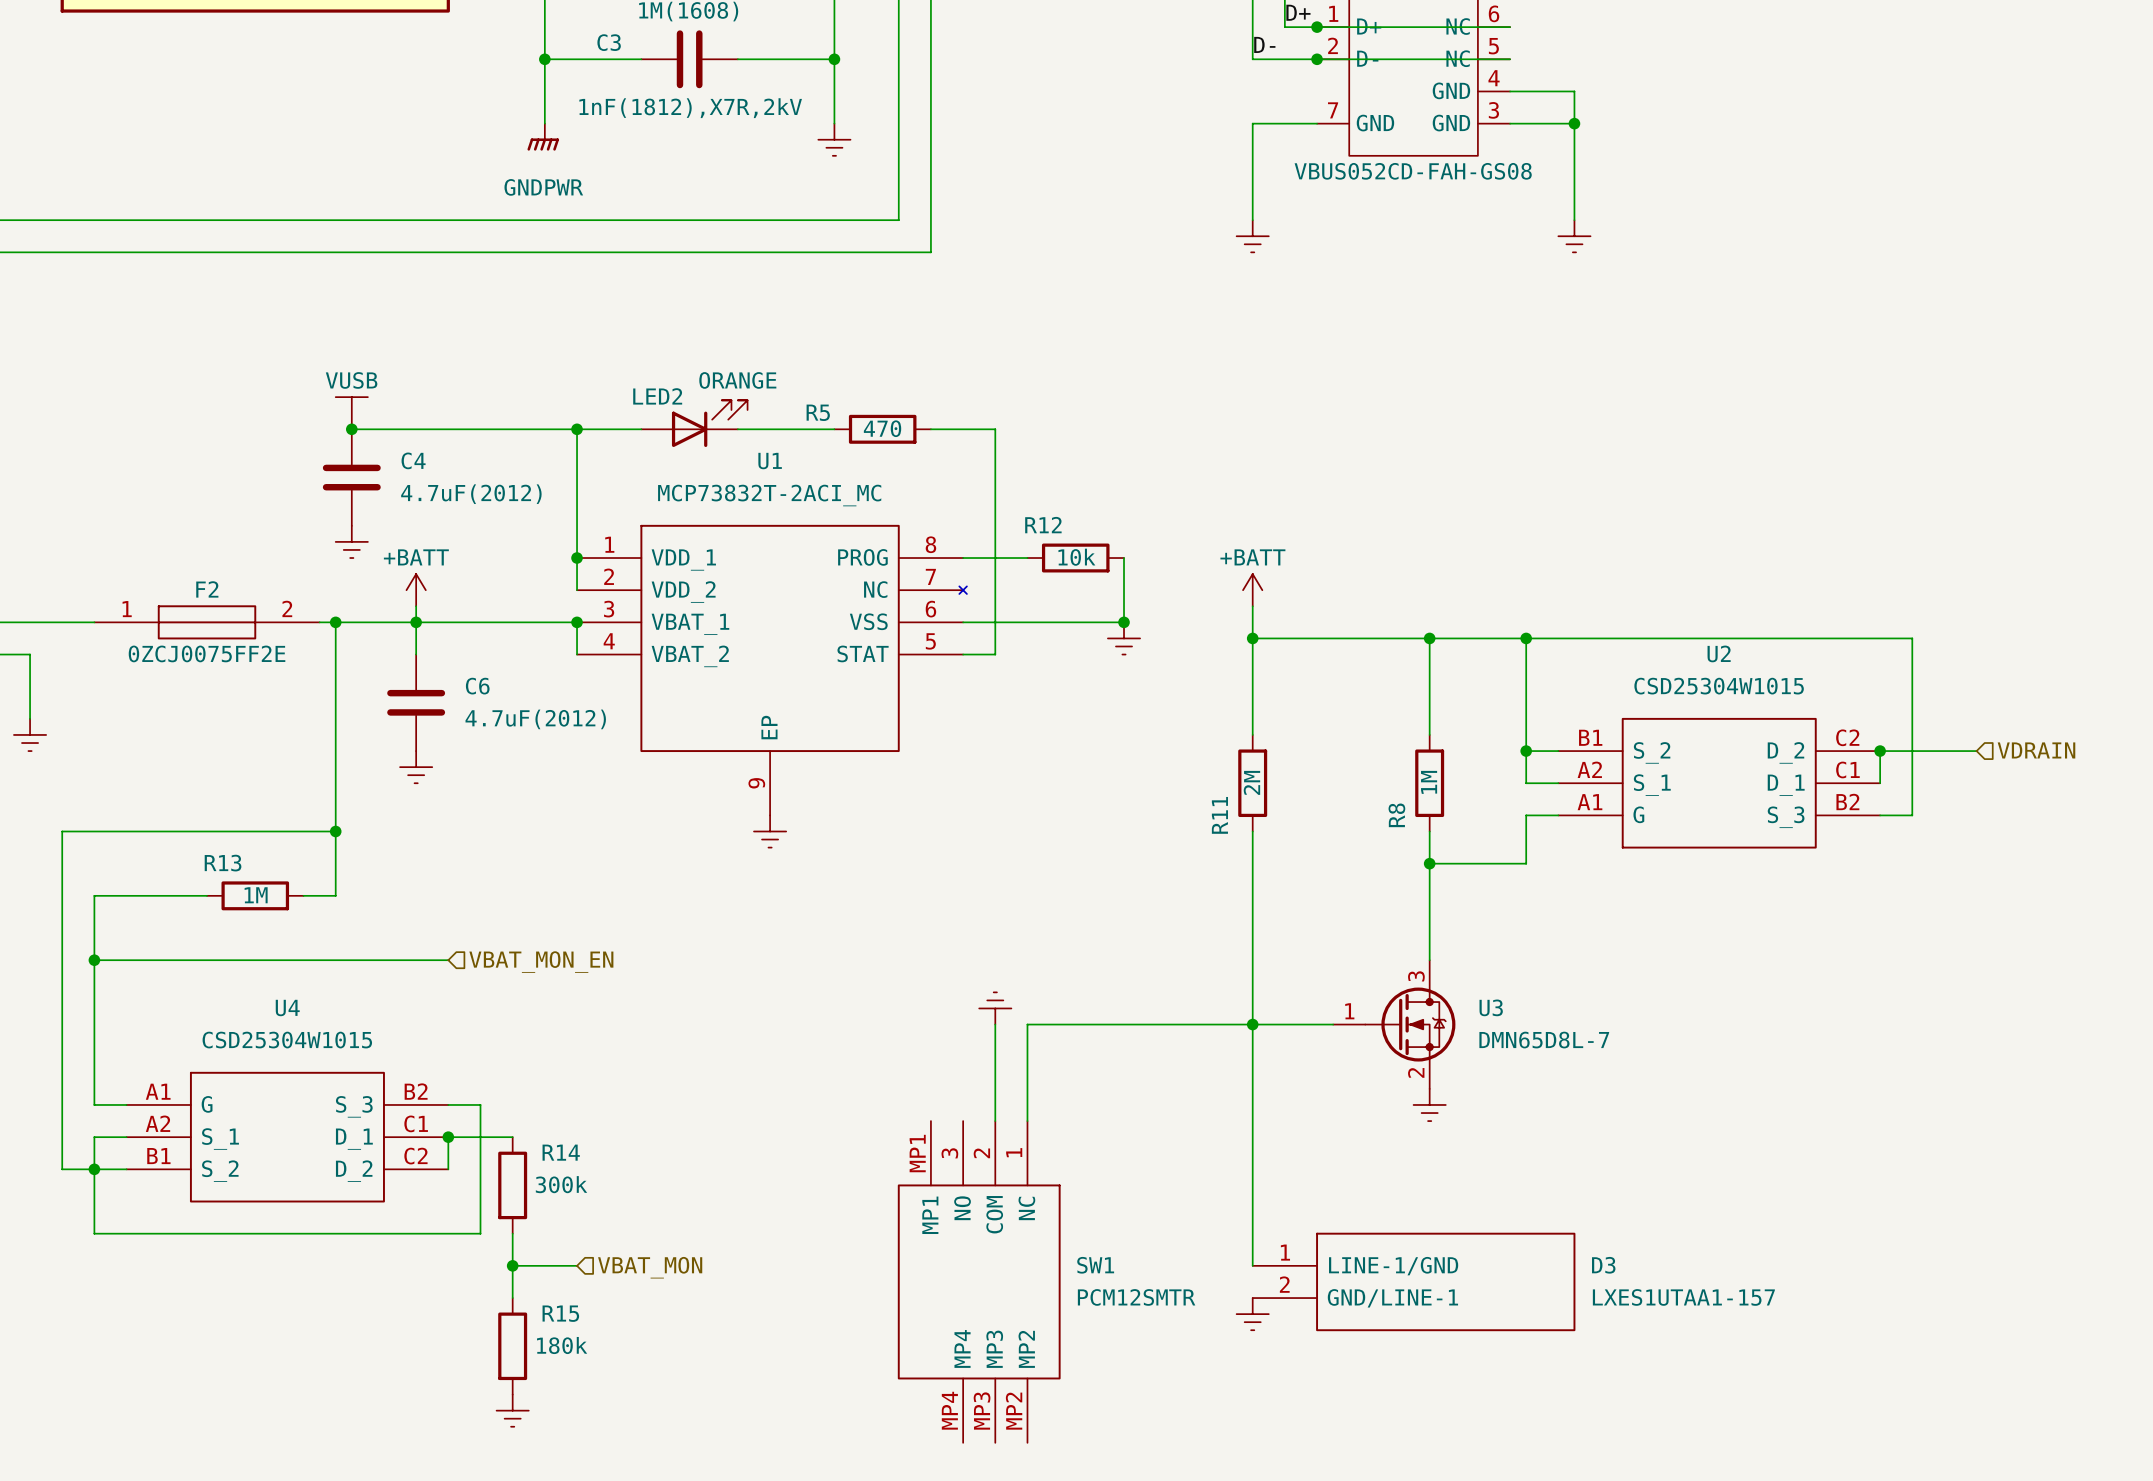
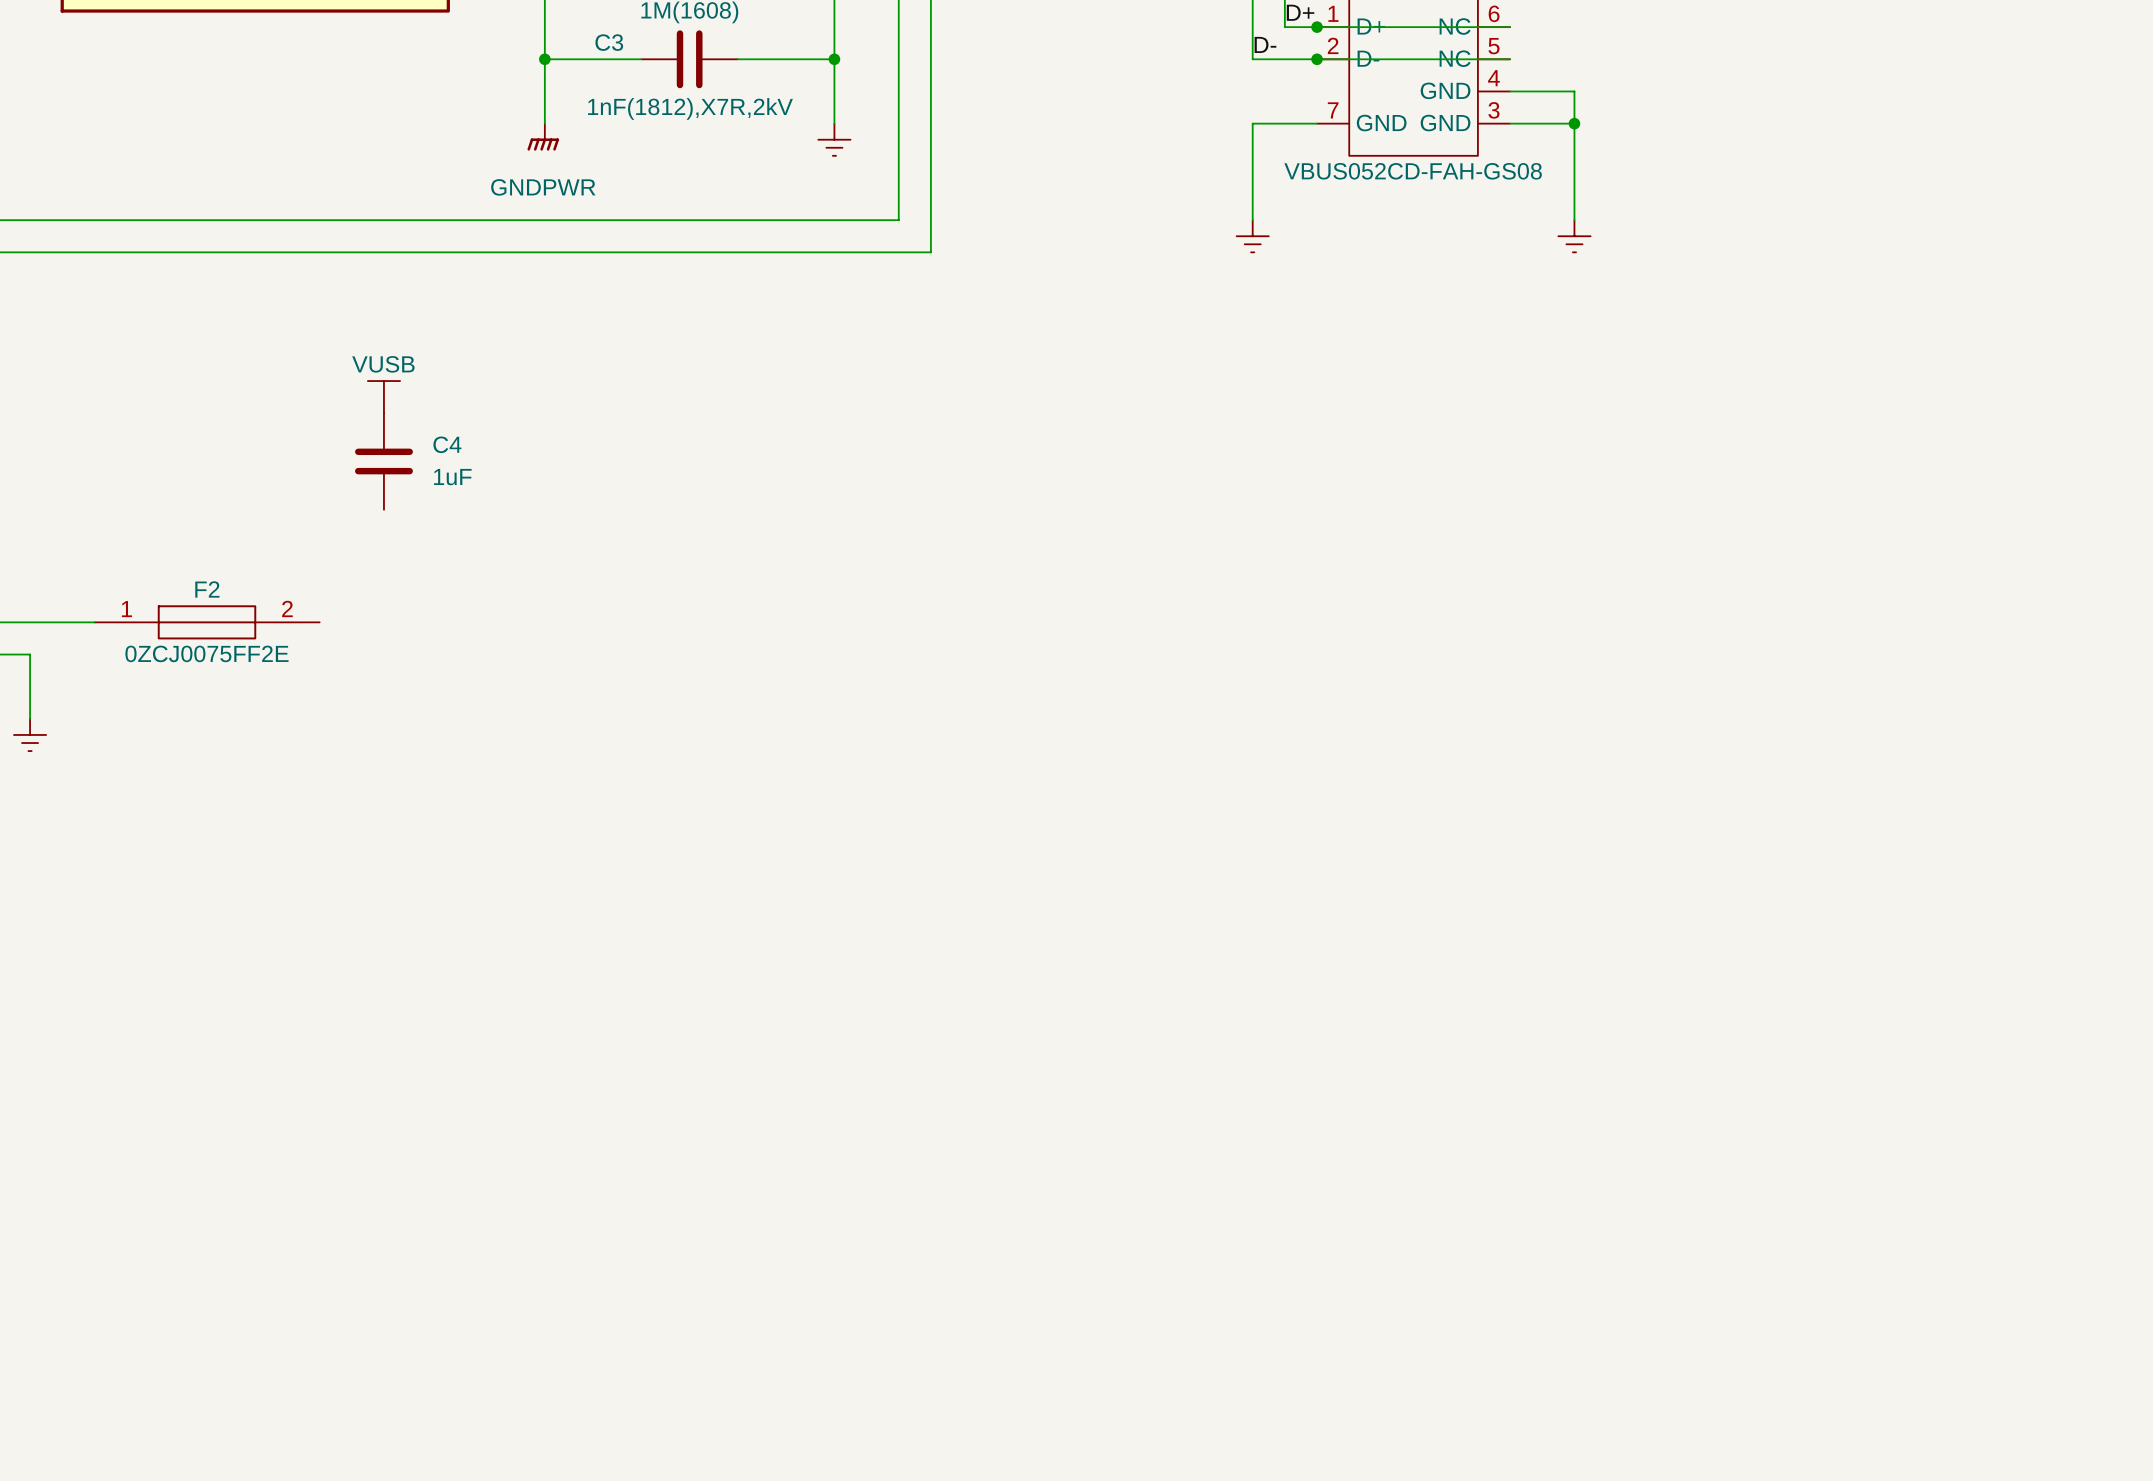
power symbol position: VUSB (351, 413) -> VUSB (383, 397)
LED2: ORANGE (694, 423) -> none
wire: (351, 429) (641, 429) -> none
junction: (351, 429) -> none
wire: (577, 429) (577, 590) -> none
junction: (577, 429) -> none
wire: (737, 429) (834, 429) -> none
R5: 470 (882, 429) -> none
wire: (930, 429) (995, 429) (995, 654) (963, 654) -> none
C4 position: (351, 477) -> (383, 461)
C4 value: 4.7uF(2012) (471, 494) -> 1uF (452, 477)
power symbol: (351, 541) -> none
junction: (577, 558) -> none
wire: (963, 558) (1027, 558) -> none
R12: 10k (1075, 558) -> none
wire: (1124, 558) (1124, 622) (963, 622) -> none
power symbol: +BATT (416, 590) -> none
power symbol: +BATT (1252, 590) -> none
wire: (416, 606) (416, 654) -> none
wire: (1252, 606) (1252, 734) -> none
wire: (319, 622) (577, 622) (577, 654) -> none
wire: (335, 622) (335, 895) (303, 895) -> none
junction: (335, 622) -> none
junction: (416, 622) -> none
junction: (577, 622) -> none
junction: (1124, 622) -> none
power symbol: (1124, 638) -> none
wire: (1252, 638) (1912, 638) (1912, 815) (1880, 815) -> none
junction: (1252, 638) -> none
wire: (1429, 638) (1429, 734) -> none
junction: (1429, 638) -> none
wire: (1526, 638) (1526, 783) (1558, 783) -> none
junction: (1526, 638) -> none
U1: MCP73832T-2ACI_MC (771, 670) -> none
C6: 4.7uF(2012) (416, 702) -> none
hierarchical label: VDRAIN (2036, 750) -> none
wire: (1526, 751) (1558, 751) -> none
junction: (1526, 751) -> none
junction: (1880, 751) -> none
wire: (1976, 751) (1880, 751) (1880, 783) -> none
power symbol: (416, 767) -> none
R11: 2M (1252, 783) -> none
R8: 1M (1429, 783) -> none
U2: CSD25304W1015 (1719, 783) -> none
wire: (1558, 815) (1526, 815) (1526, 863) (1429, 863) -> none
wire: (335, 831) (62, 831) (62, 1169) (126, 1169) -> none
junction: (335, 831) -> none
power symbol: (770, 831) -> none
wire: (1252, 831) (1252, 1265) -> none
wire: (1429, 831) (1429, 960) -> none
junction: (1429, 863) -> none
wire: (207, 895) (94, 895) (94, 1104) (126, 1104) -> none
R13: 1M (255, 895) -> none
wire: (94, 960) (448, 960) -> none
junction: (94, 960) -> none
hierarchical label: VBAT_MON_EN (541, 962) -> none
power symbol: (995, 1008) -> none
wire: (995, 1024) (995, 1121) -> none
junction: (1252, 1024) -> none
wire: (1333, 1024) (1027, 1024) (1027, 1121) -> none
U3: DMN65D8L-7 (1394, 1024) -> none
wire: (448, 1104) (480, 1104) (480, 1233) (94, 1233) (94, 1137) (126, 1137) -> none
power symbol: (1429, 1104) -> none
U4: CSD25304W1015 (287, 1137) -> none
junction: (448, 1137) -> none
wire: (512, 1137) (448, 1137) (448, 1169) -> none
junction: (94, 1169) -> none
R14: 300k (512, 1185) -> none
wire: (512, 1233) (512, 1298) -> none
wire: (512, 1265) (577, 1265) -> none
junction: (512, 1265) -> none
hierarchical label: VBAT_MON (650, 1267) -> none
SW1: PCM12SMTR (979, 1281) -> none
D3: LXES1UTAA1-157 (1414, 1281) -> none
power symbol: (1252, 1314) -> none
R15: 180k (512, 1346) -> none
power symbol: (512, 1410) -> none

